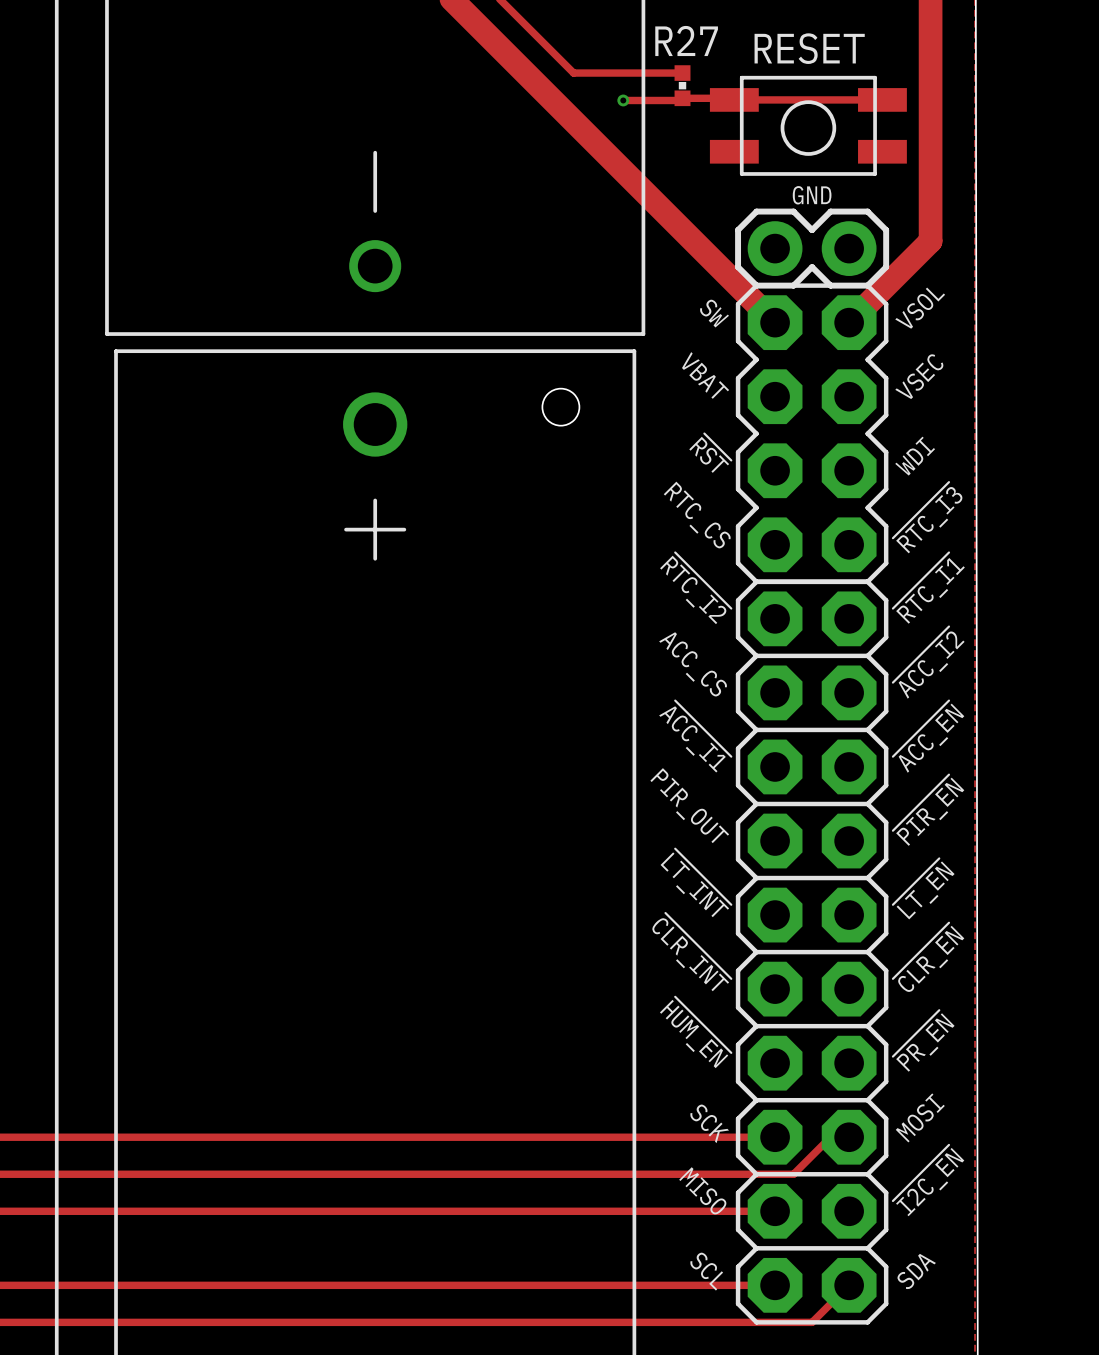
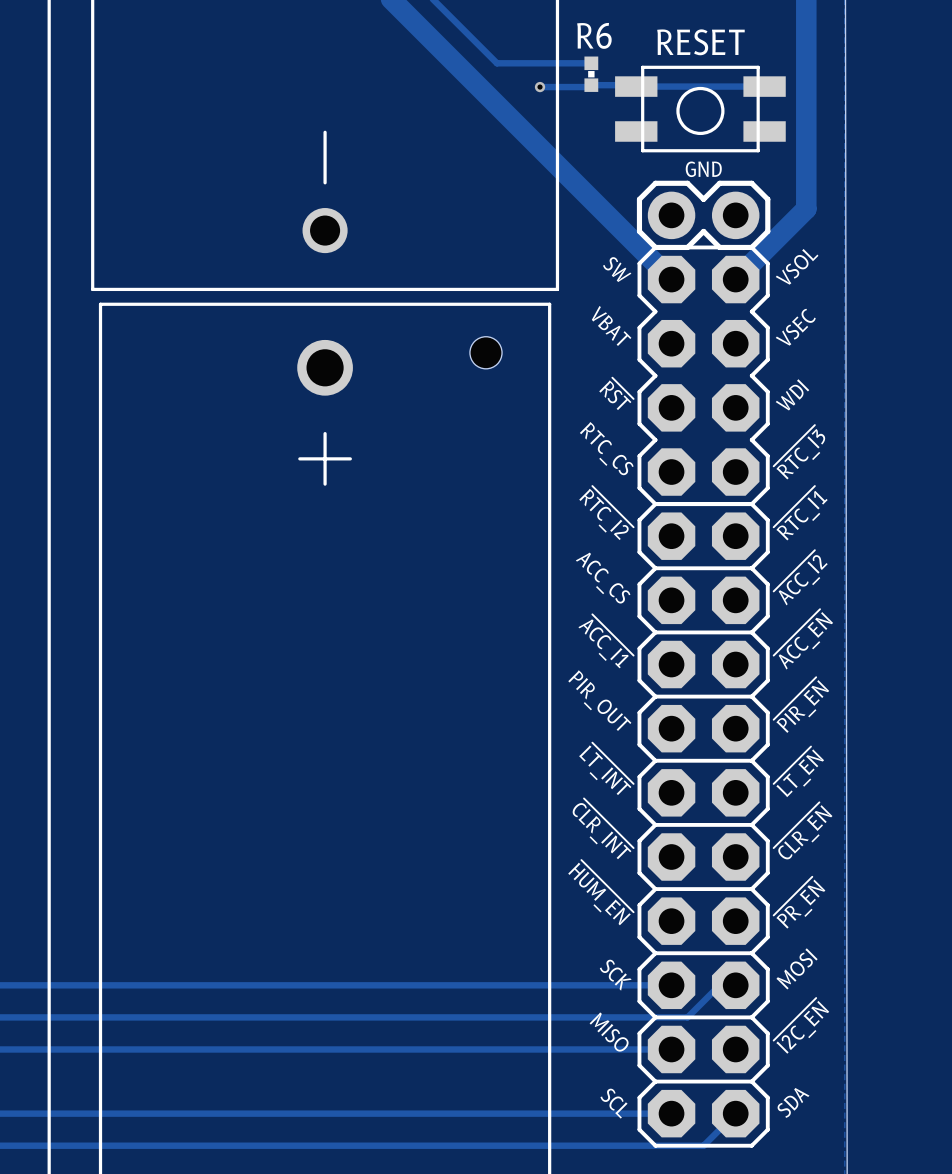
R27 name: R27 (686, 40) -> R6 (594, 35)

